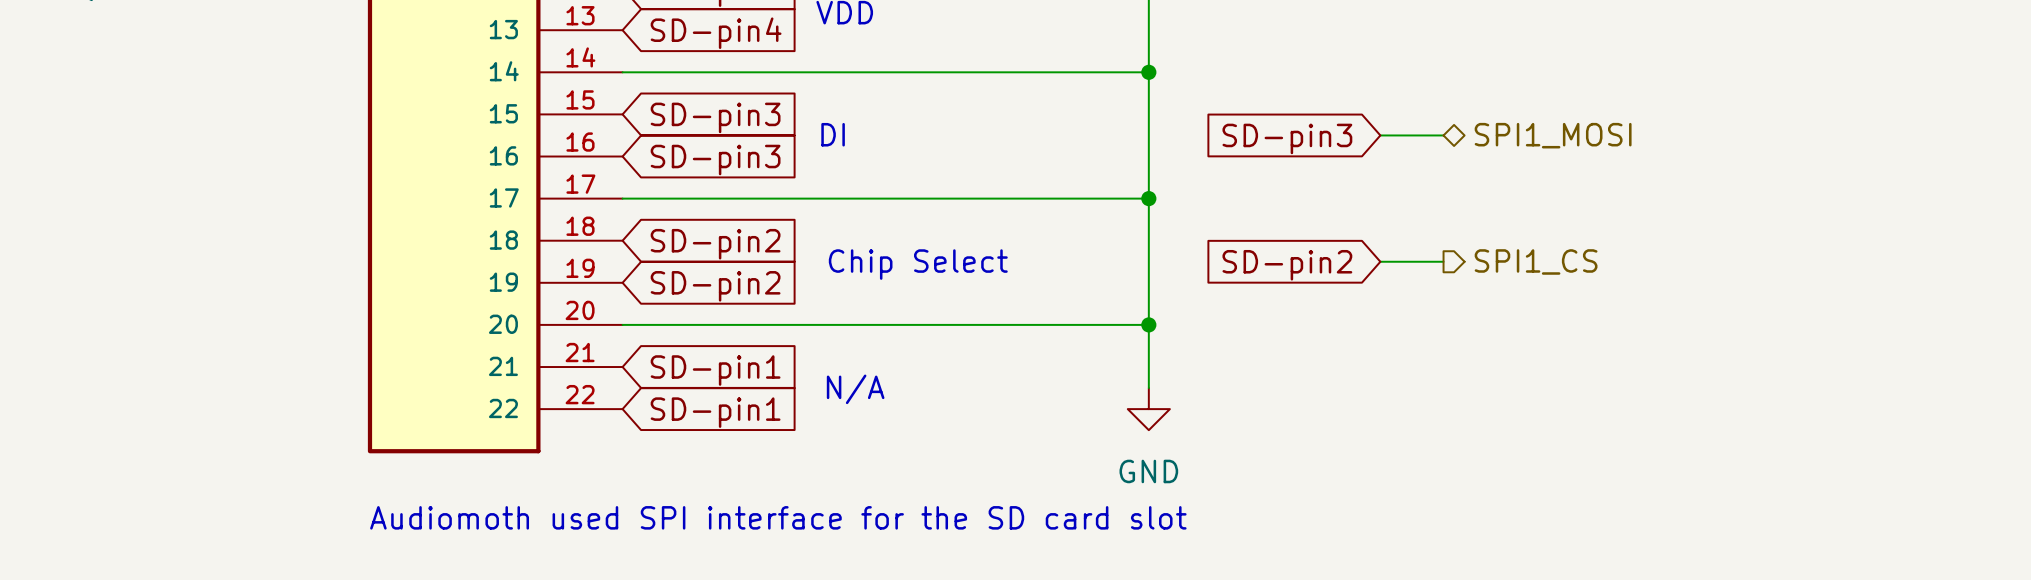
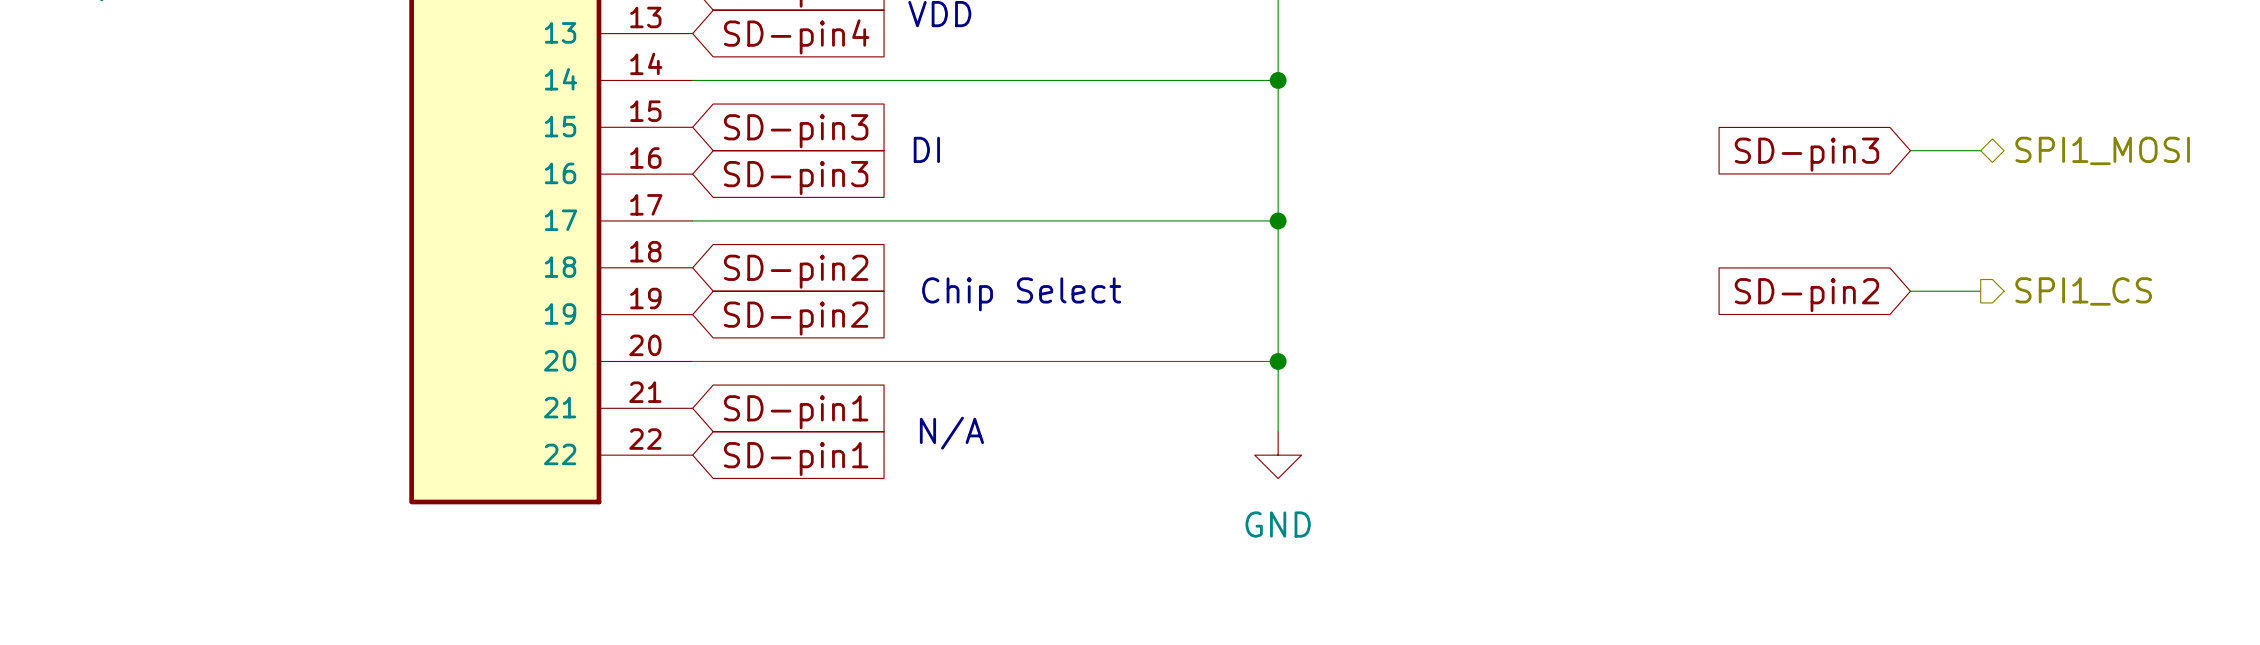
wire: (1380, 135) (1443, 135) -> (1910, 150) (1980, 150)
hierarchical label position: SPI1_MOSI (1553, 135) -> SPI1_MOSI (2102, 150)
global label position: SD-pin3 (1287, 138) -> SD-pin3 (1806, 154)
wire: (1380, 261) (1443, 261) -> (1910, 291) (1980, 291)
hierarchical label position: SPI1_CS (1536, 261) -> SPI1_CS (2083, 291)
global label position: SD-pin2 (1287, 265) -> SD-pin2 (1806, 295)
text: Audiomoth used SPI interface for the SD card slot (778, 517) -> none

